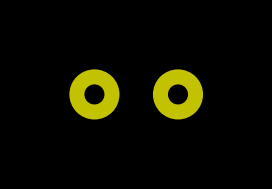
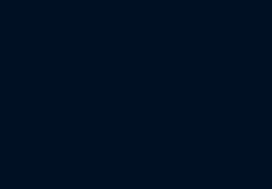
part: (136, 94) -> none

